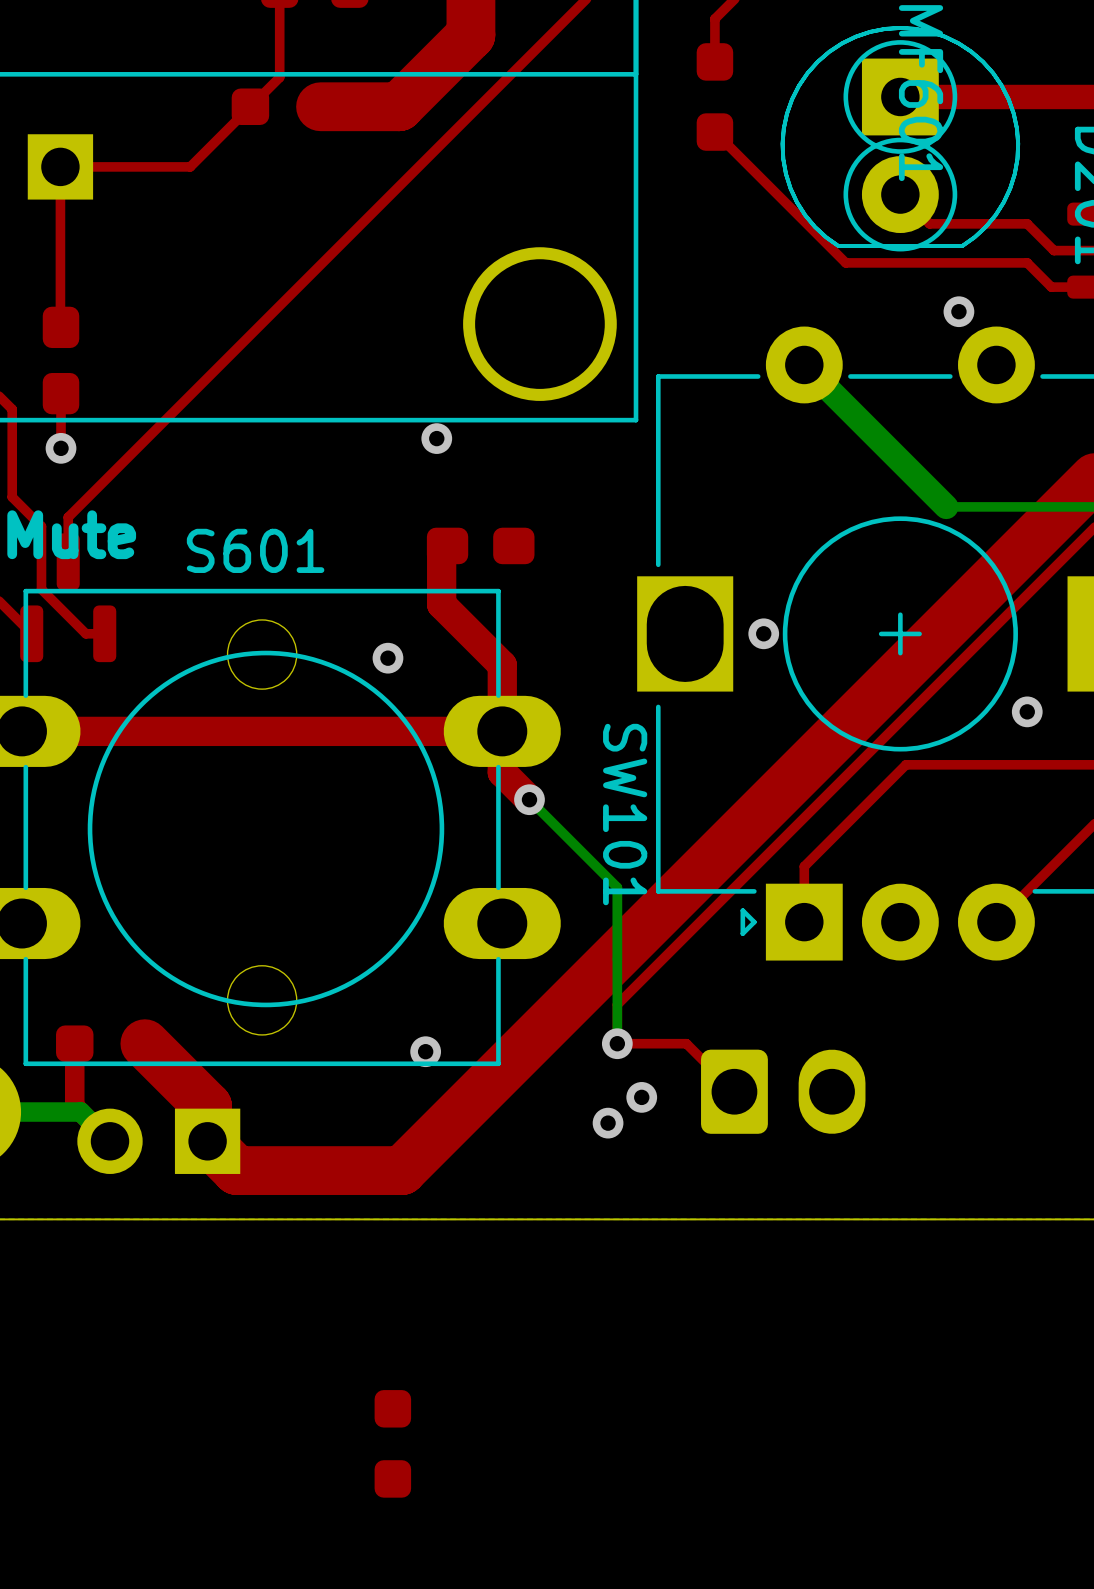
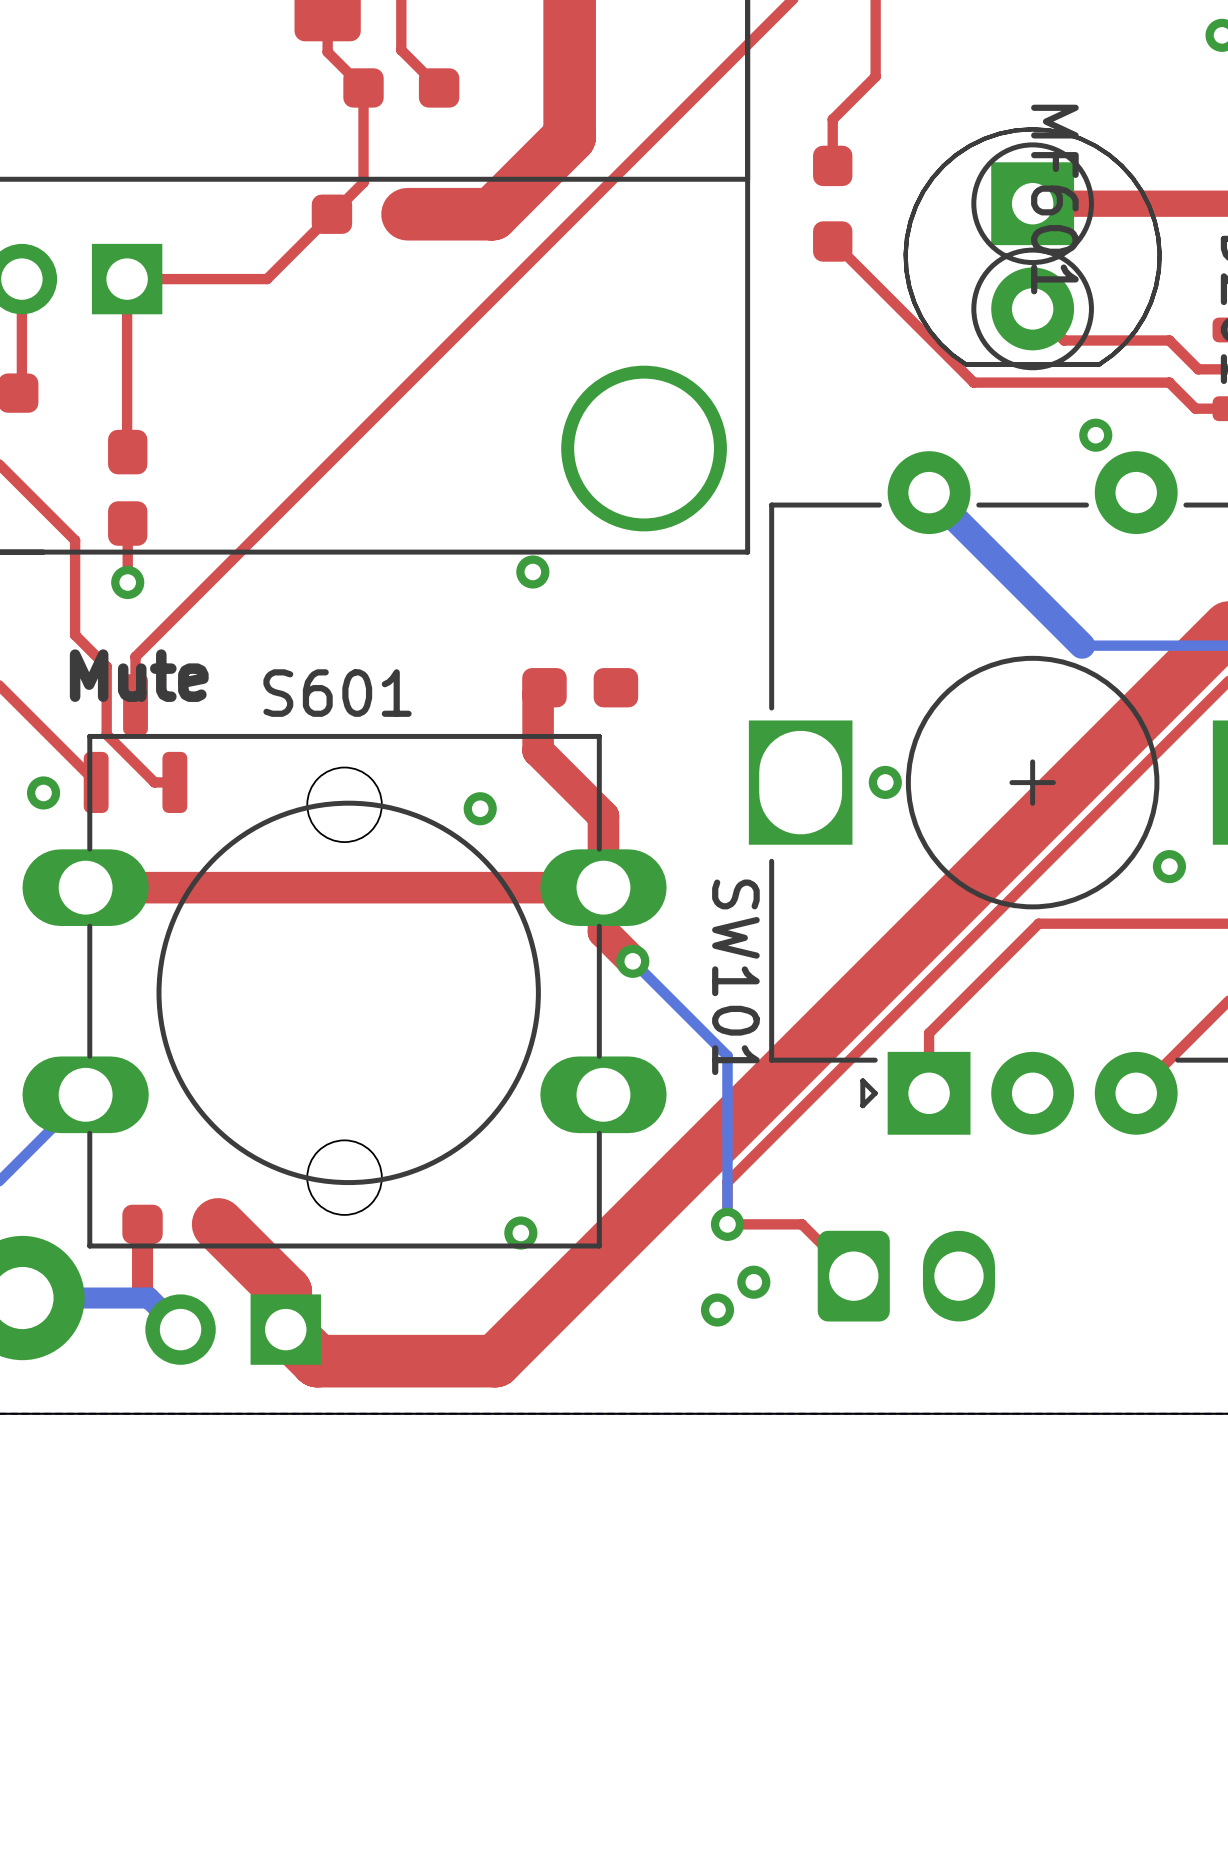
part: (392, 1443) -> none

